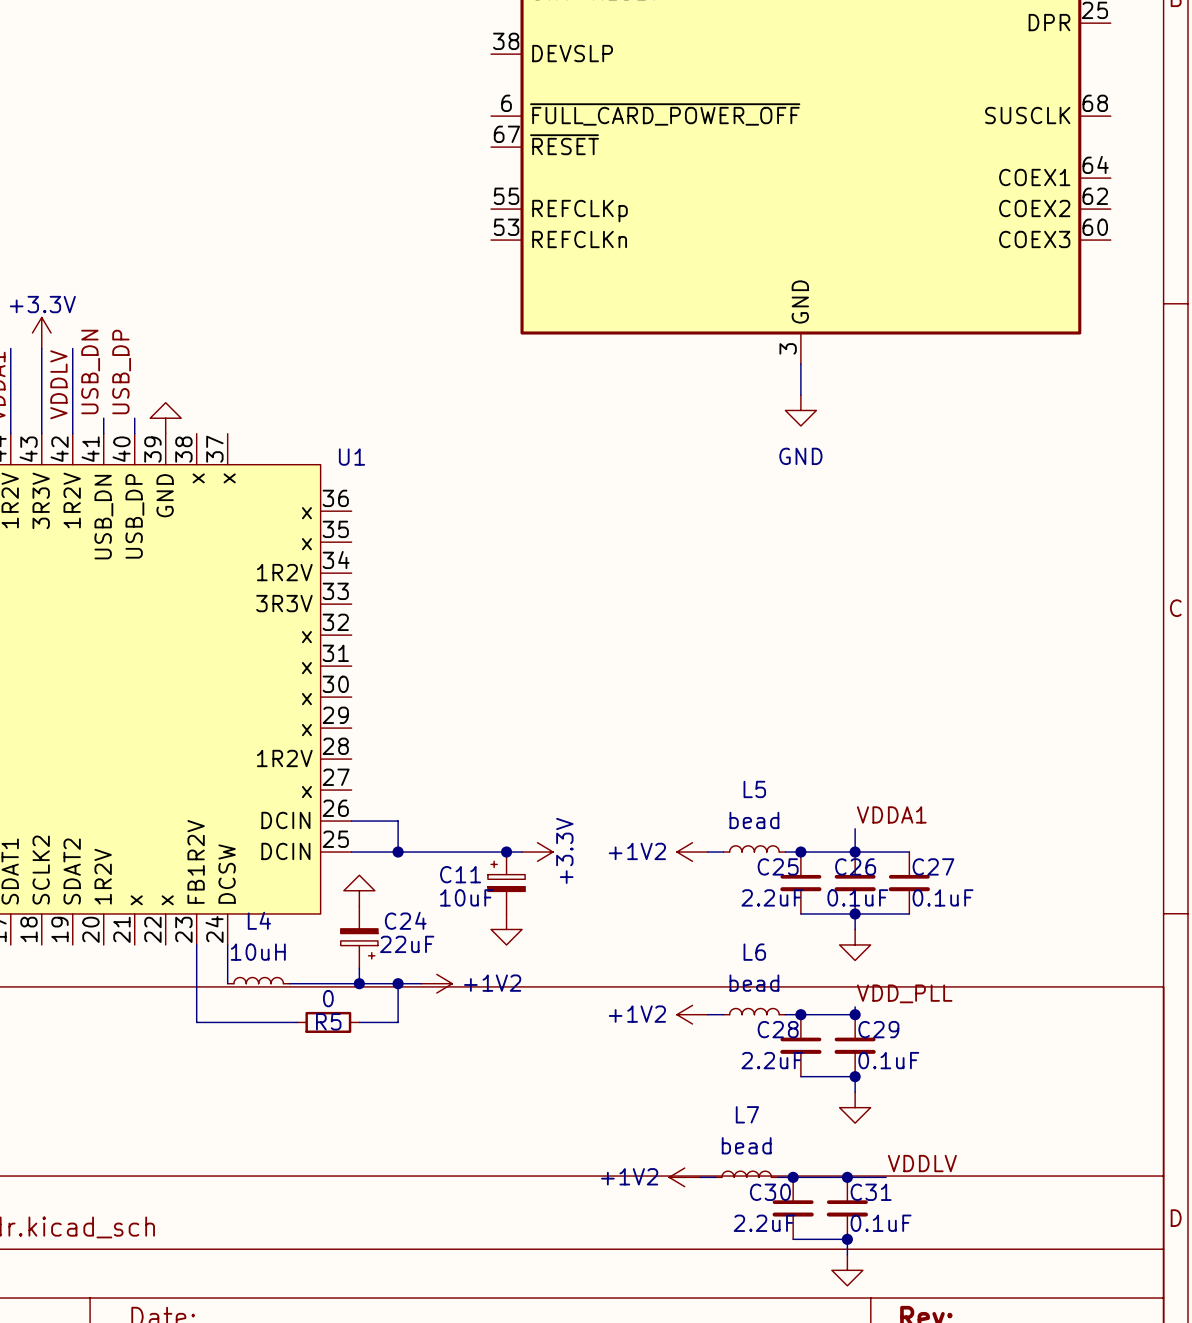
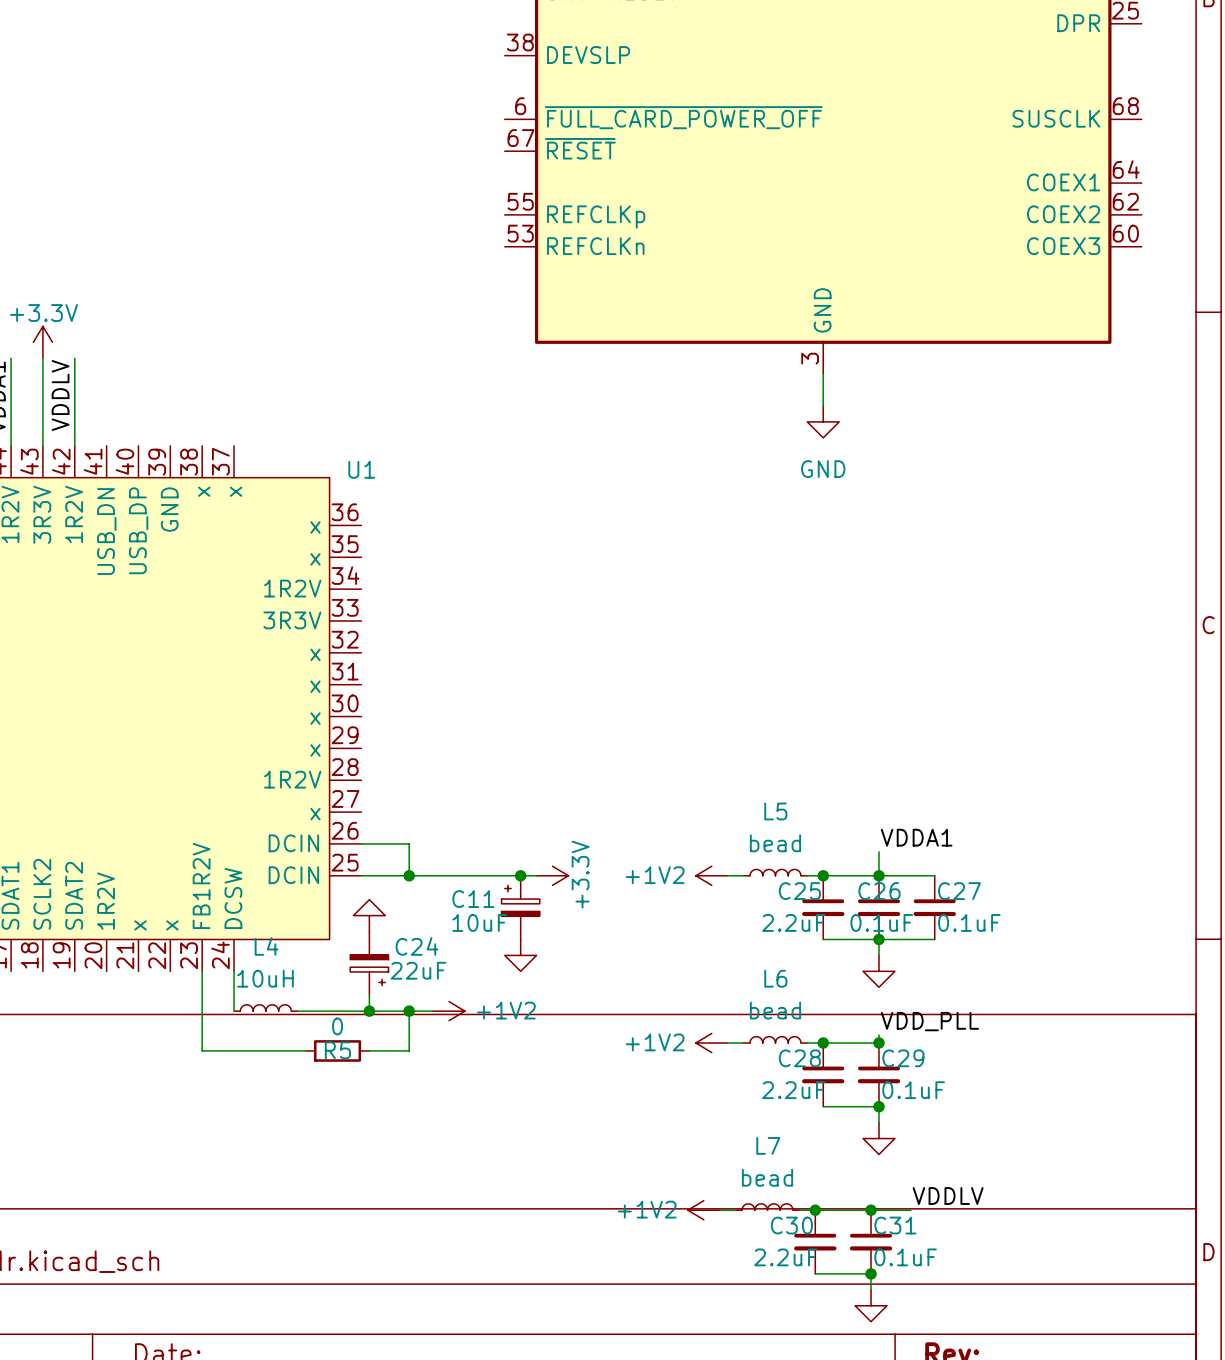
label: USB_DN (90, 371) -> none
label: USB_DP (121, 371) -> none
wire: (103, 418) (103, 433) -> none
wire: (134, 418) (134, 433) -> none
power symbol: (165, 418) -> none

